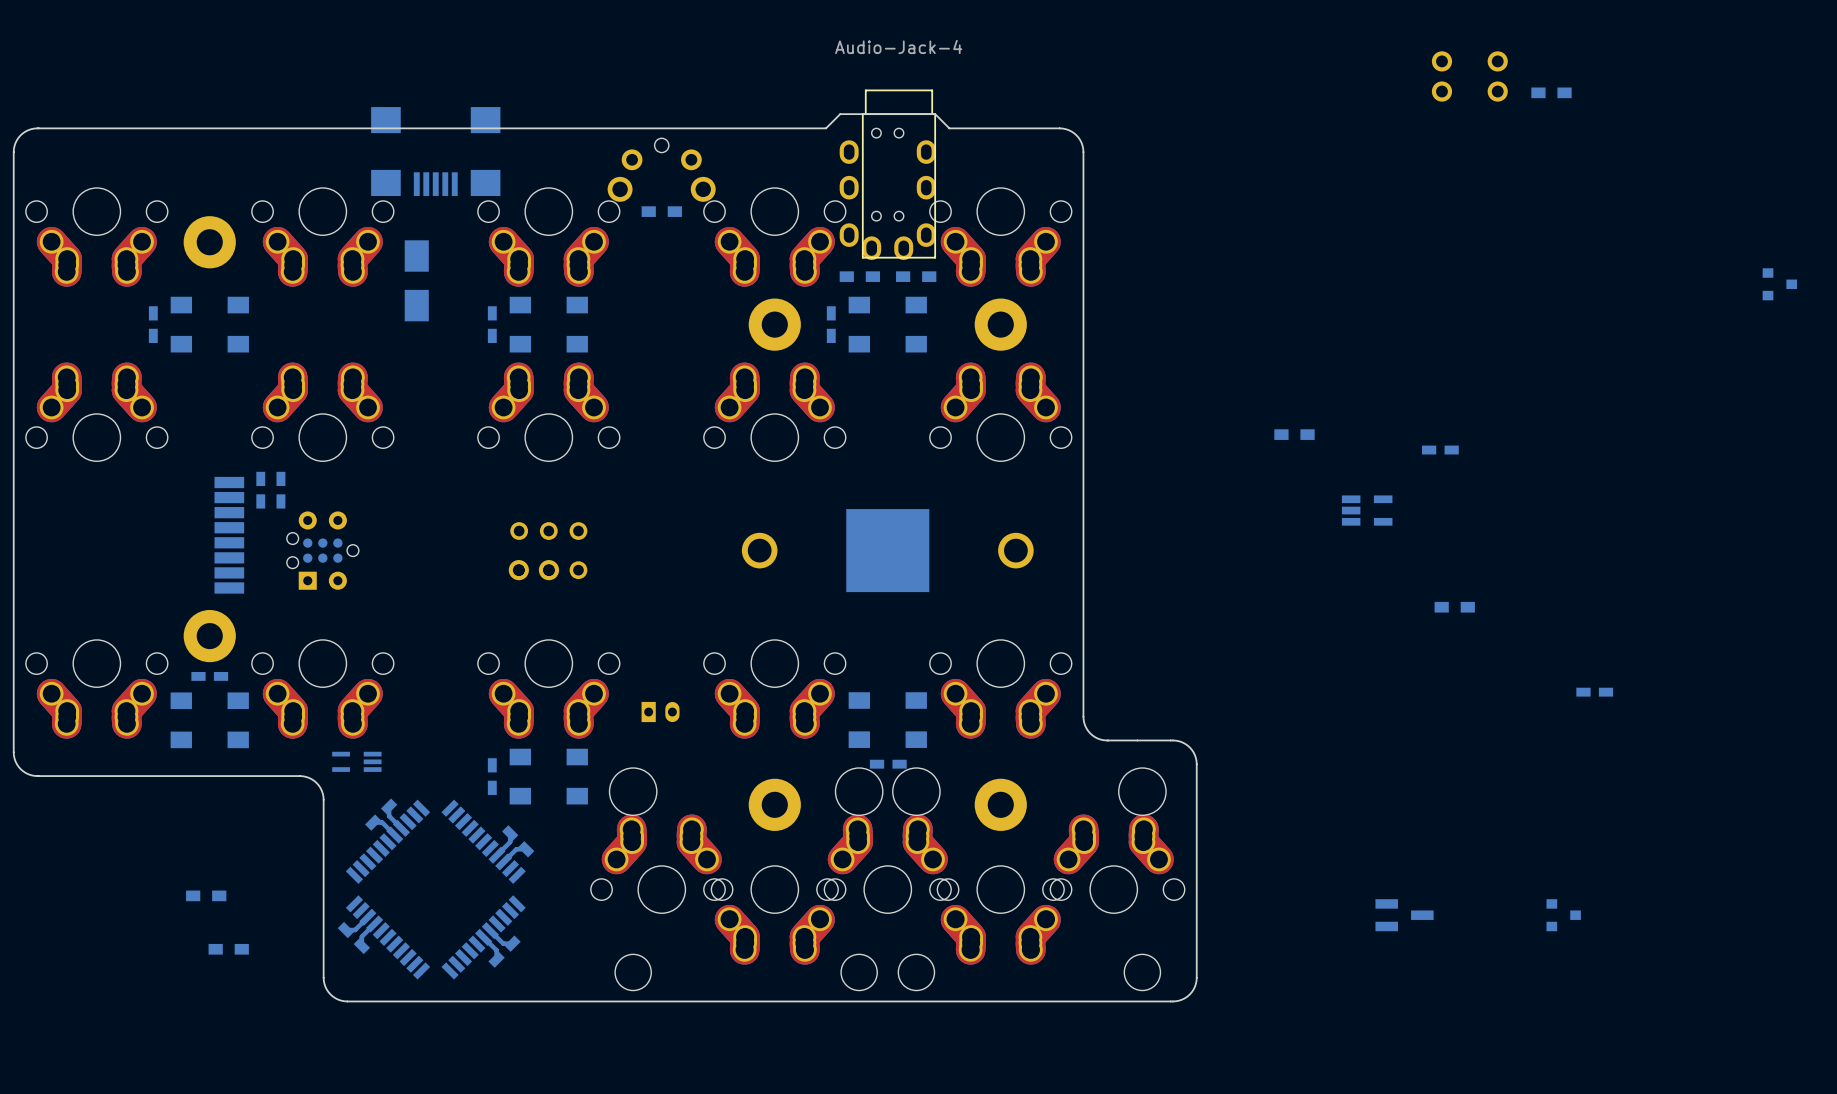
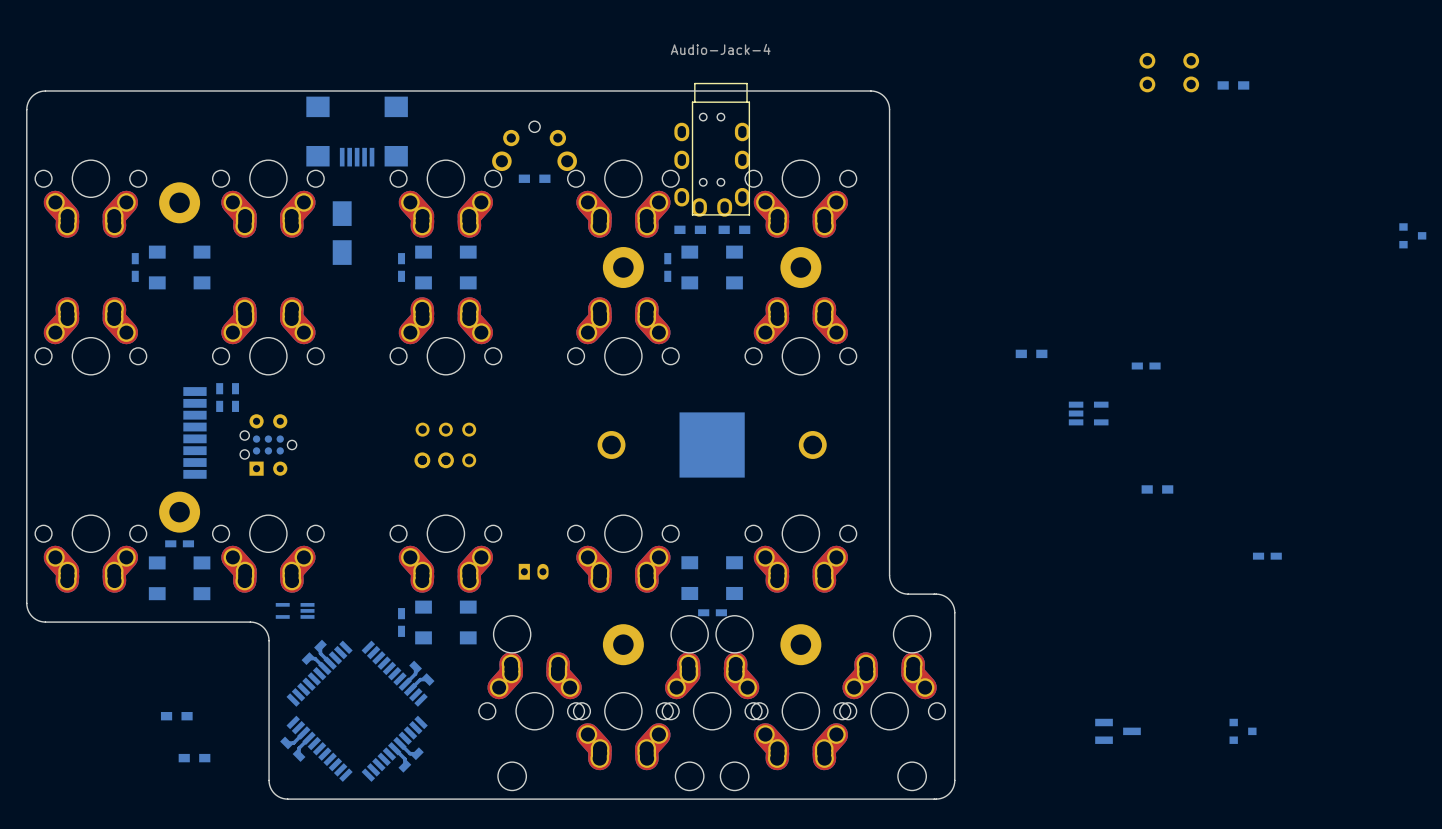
board edge: (1137, 740) (1098, 738) (1088, 731) (1083, 719) (1083, 152) (1080, 140) (1071, 131) (1059, 128) (949, 128) (935, 114) (840, 114) (826, 128) (37, 128) (28, 130) (20, 135) (15, 143) (13, 152) (13, 752) (15, 761) (20, 769) (28, 774) (38, 776) -> (908, 594) (895, 588) (889, 575) (889, 109) (887, 100) (880, 93) (870, 90) (45, 90) (32, 96) (26, 109) (26, 603) (32, 616) (45, 622)

